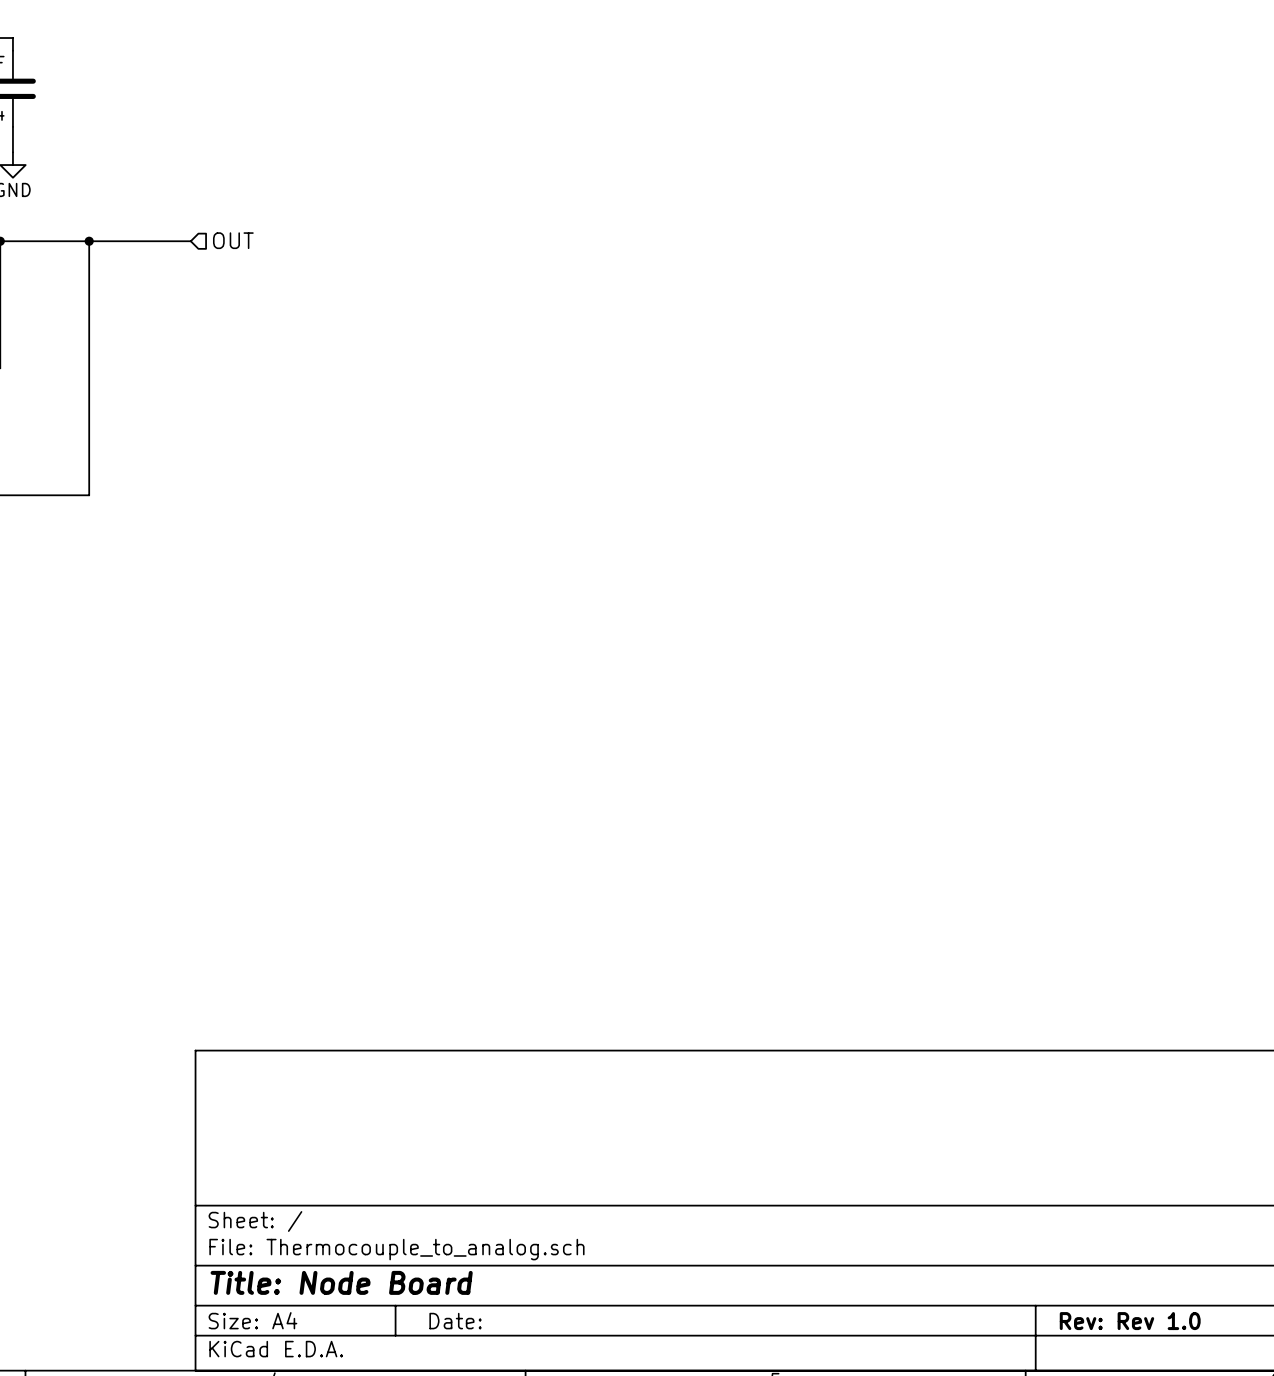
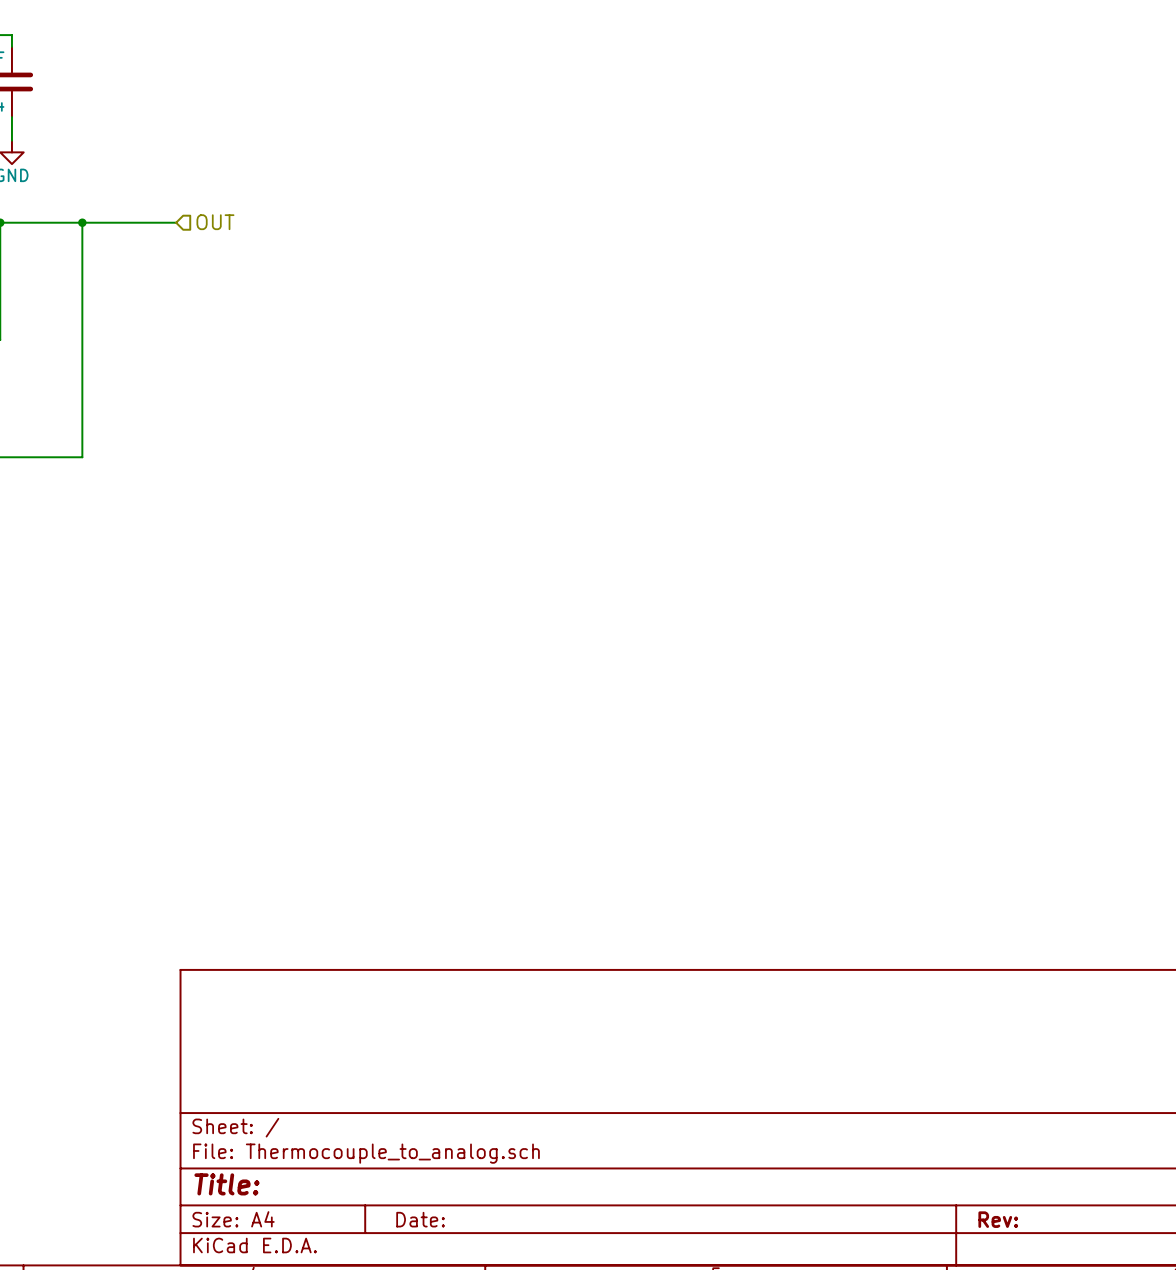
title block: Title: Node Board (341, 1282) -> Title: (226, 1184)
title block: Rev: Rev 1.0 (1130, 1321) -> Rev: (998, 1219)

